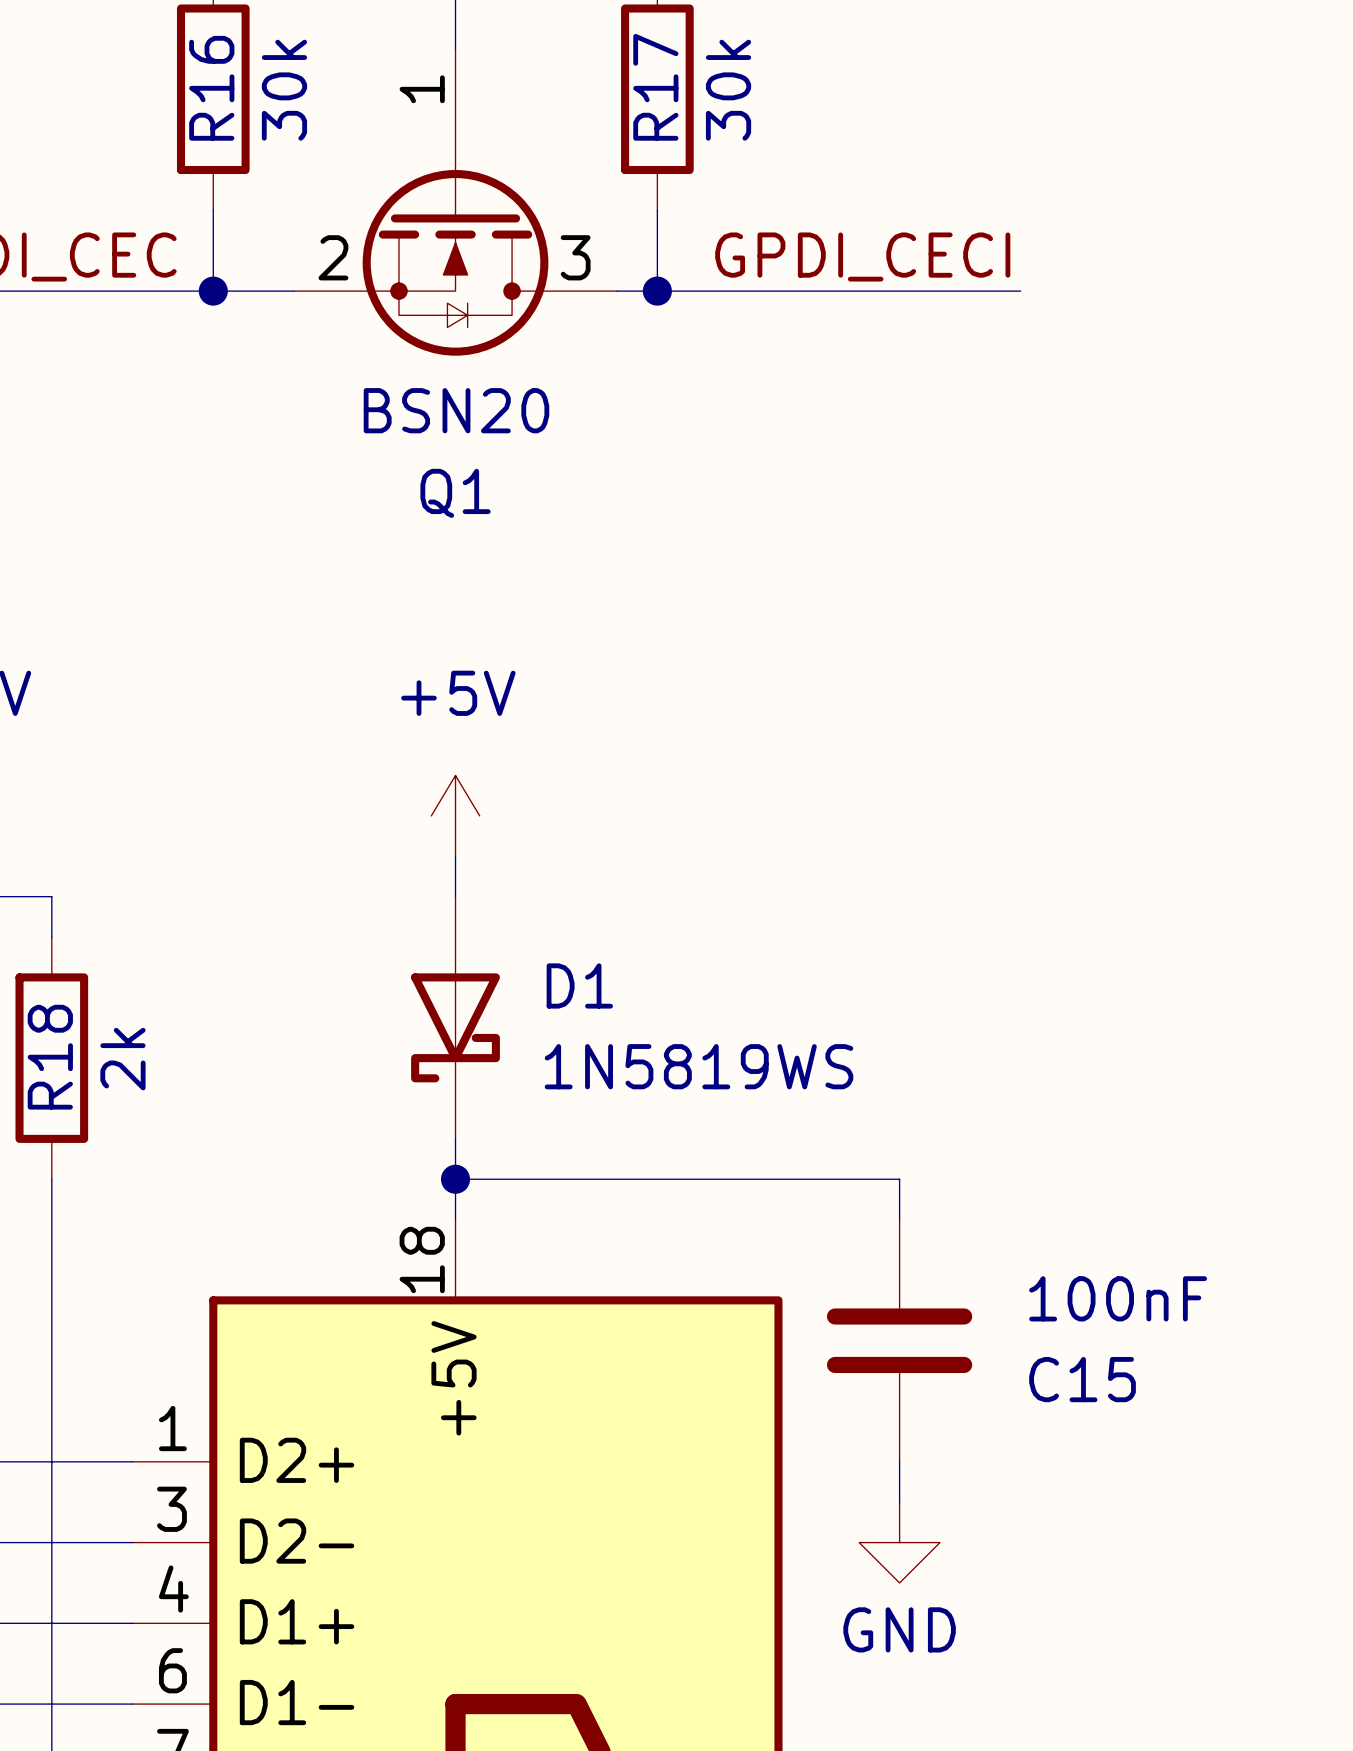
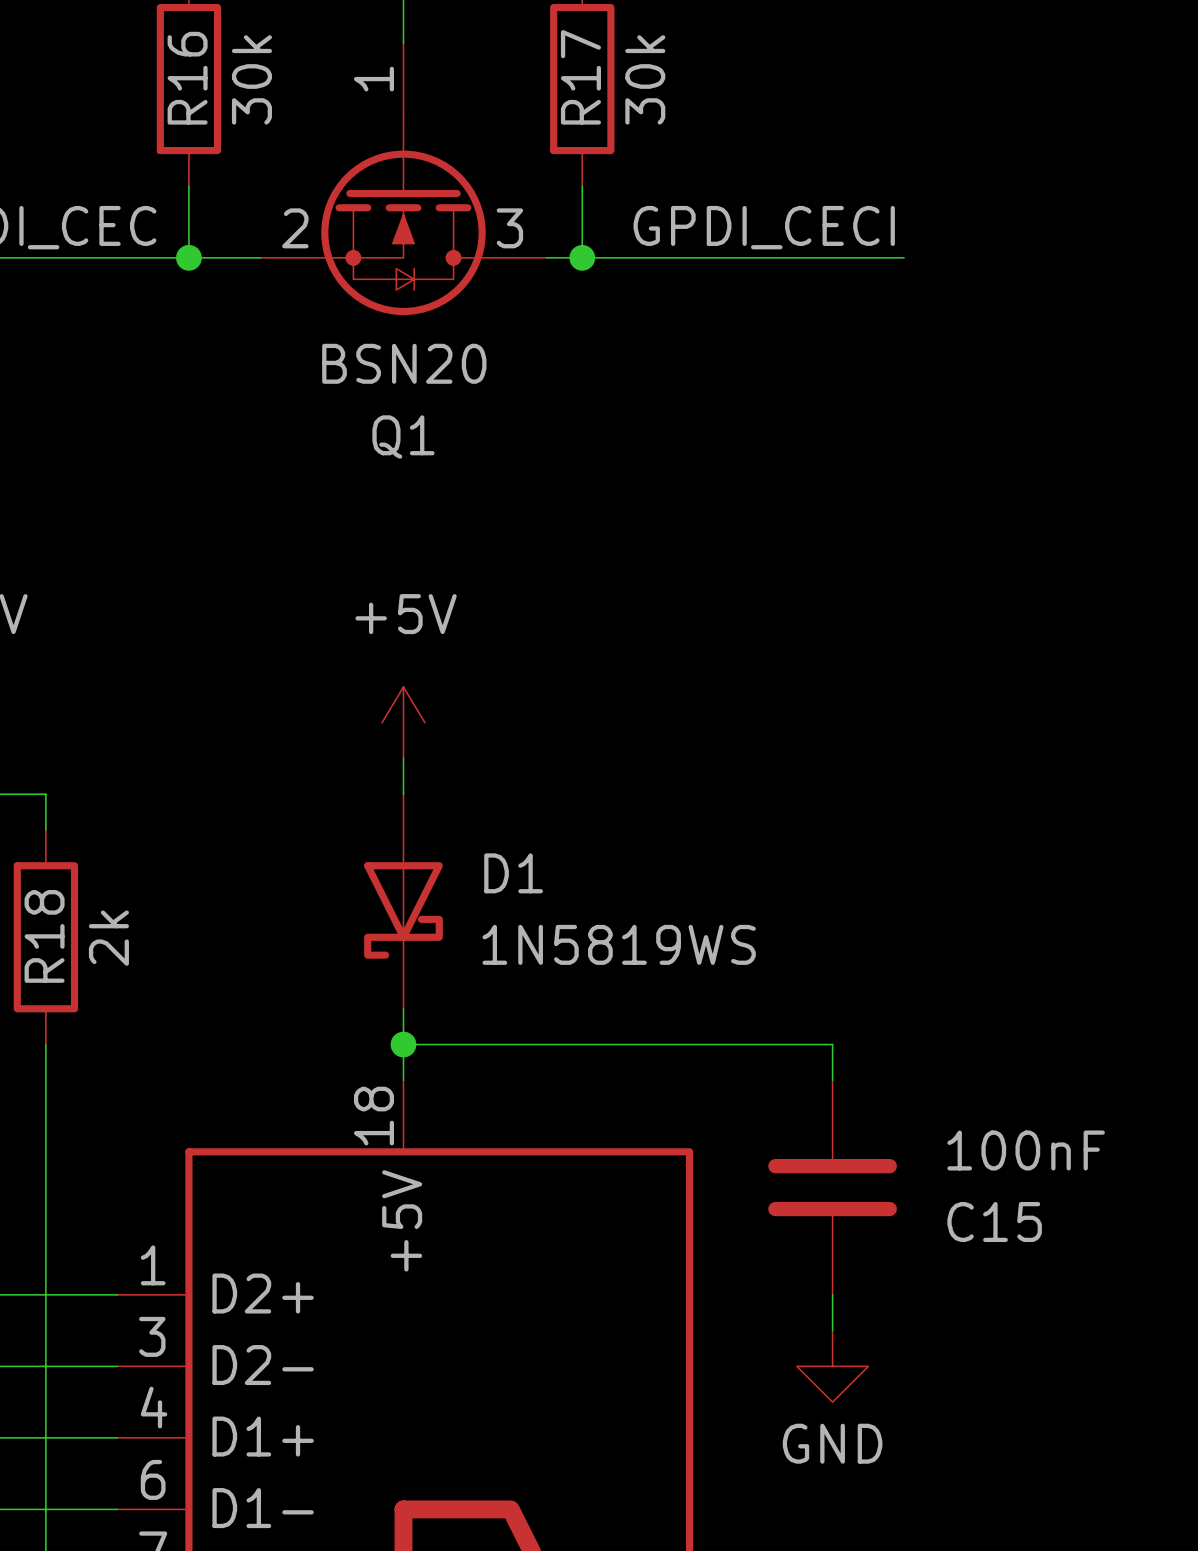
wire: (899, 1179) (899, 1219) -> (796, 1044) (832, 1044) (832, 1080)
C15 position: (899, 1340) -> (832, 1187)
wire: (899, 1461) (899, 1502) -> (832, 1294) (832, 1330)
power symbol position: GND (899, 1542) -> GND (832, 1366)

